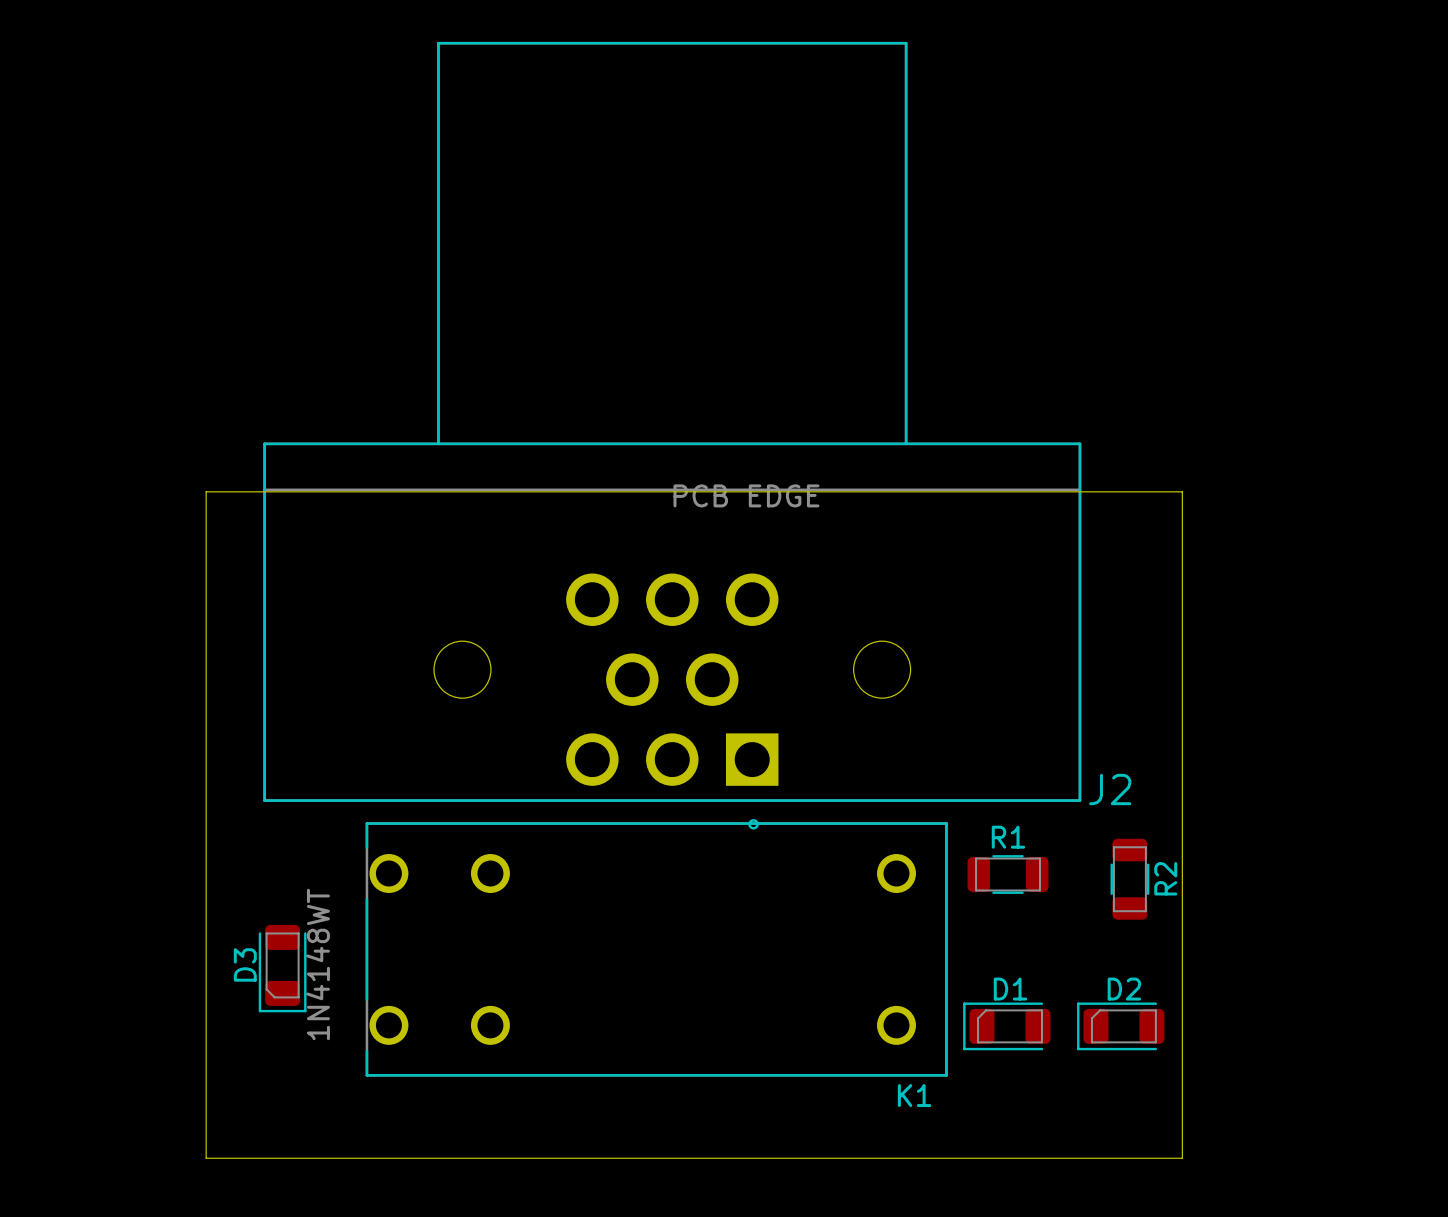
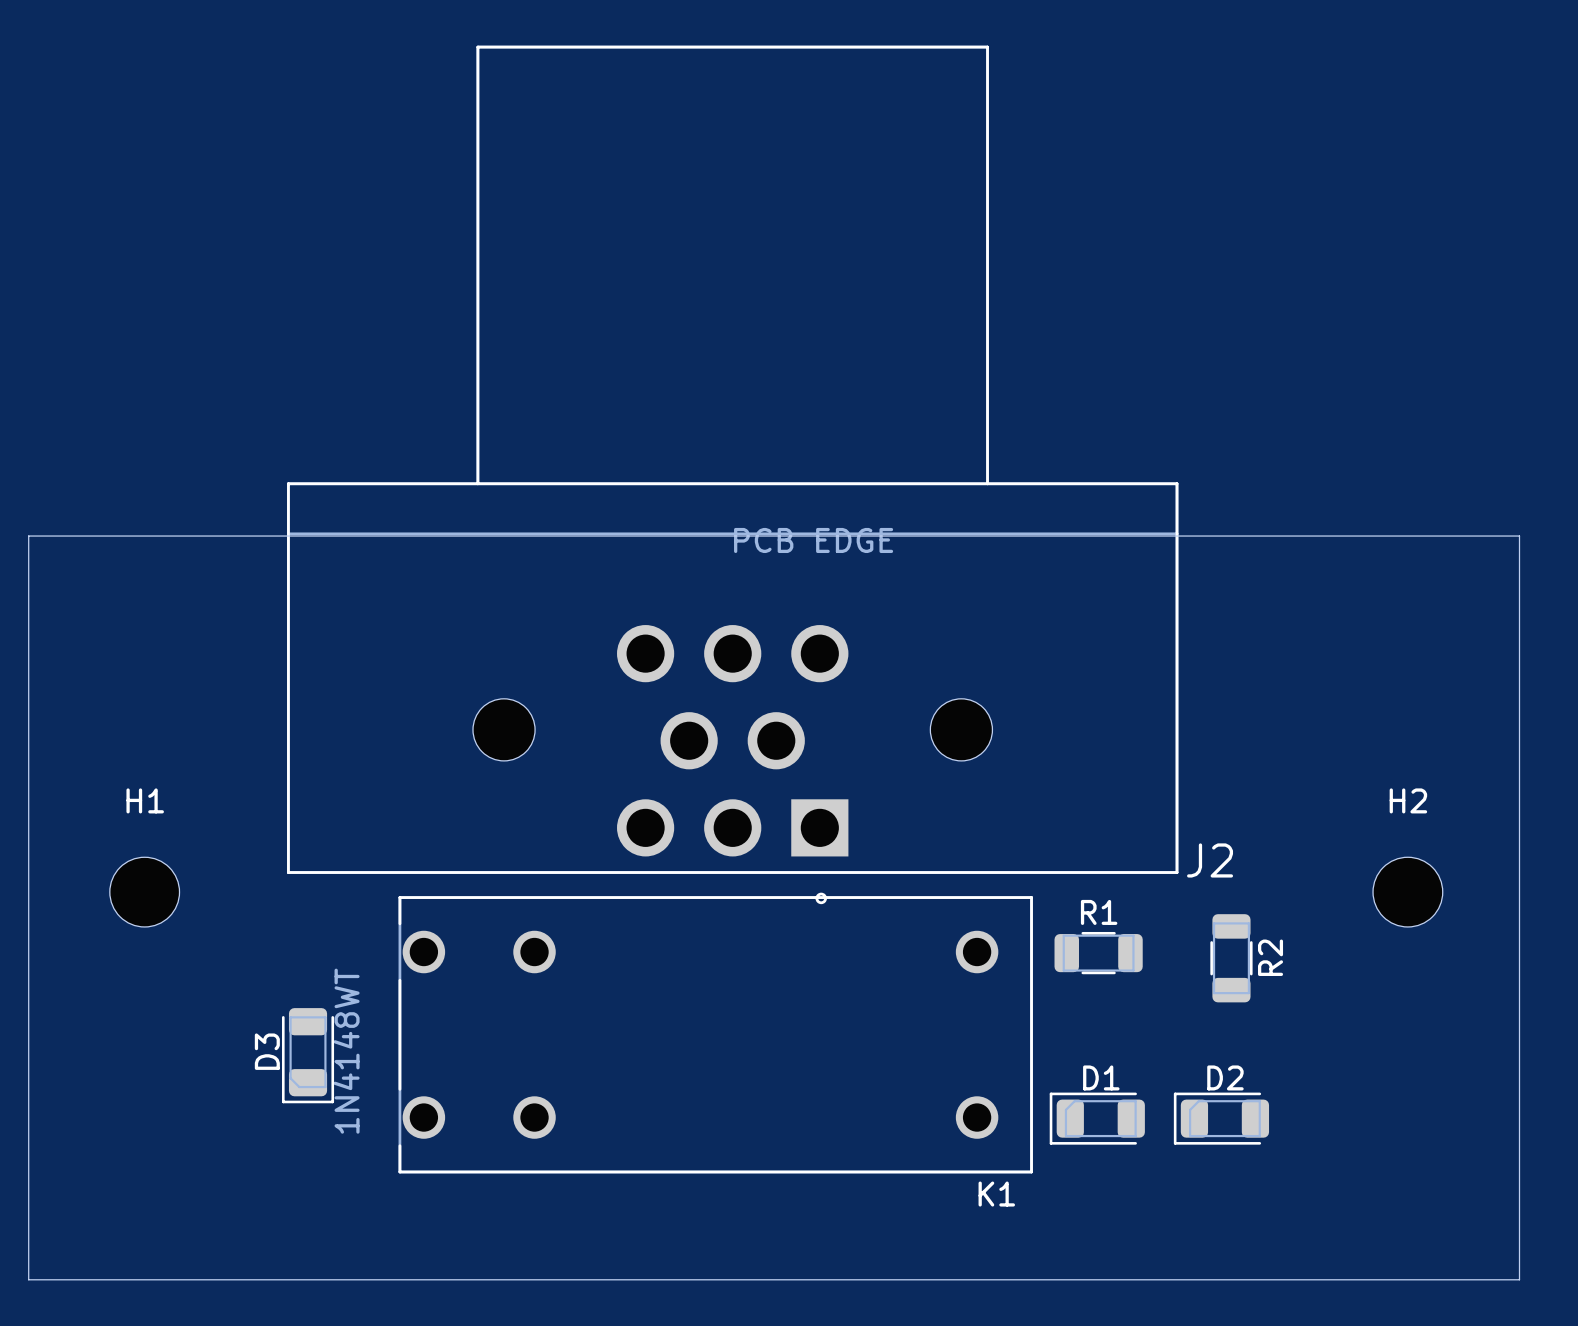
board edge: (206, 491) (206, 1158) (1182, 1158) (1182, 491) -> (224, 536) (28, 536) (28, 1279) (1519, 1279) (1519, 536) (1288, 536)
H1: none -> (144, 892)
H2: none -> (1407, 892)

